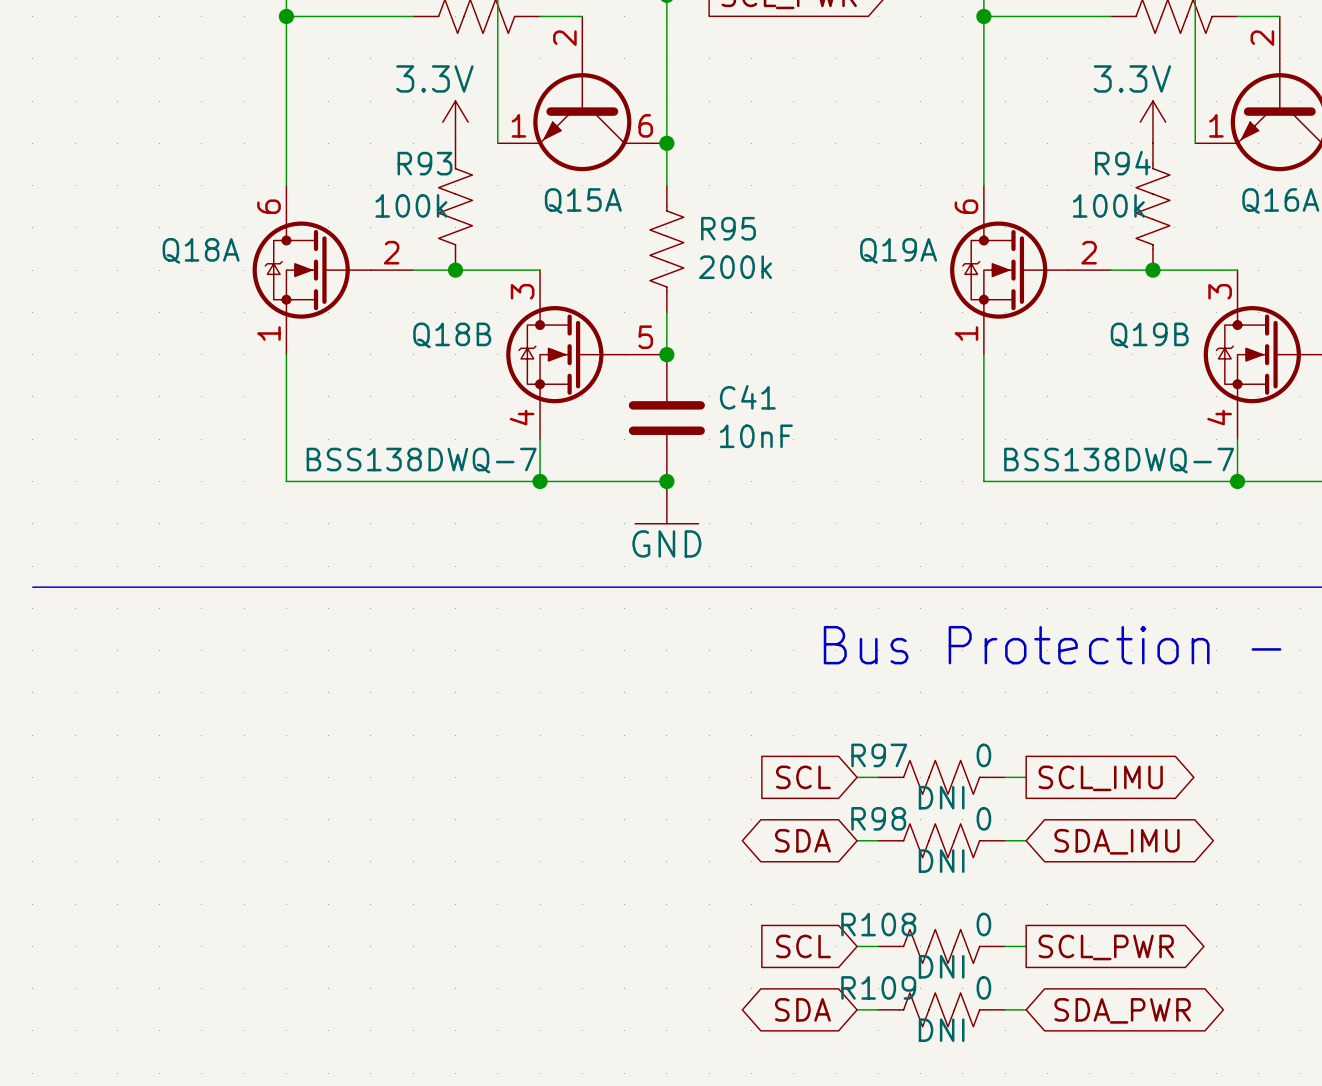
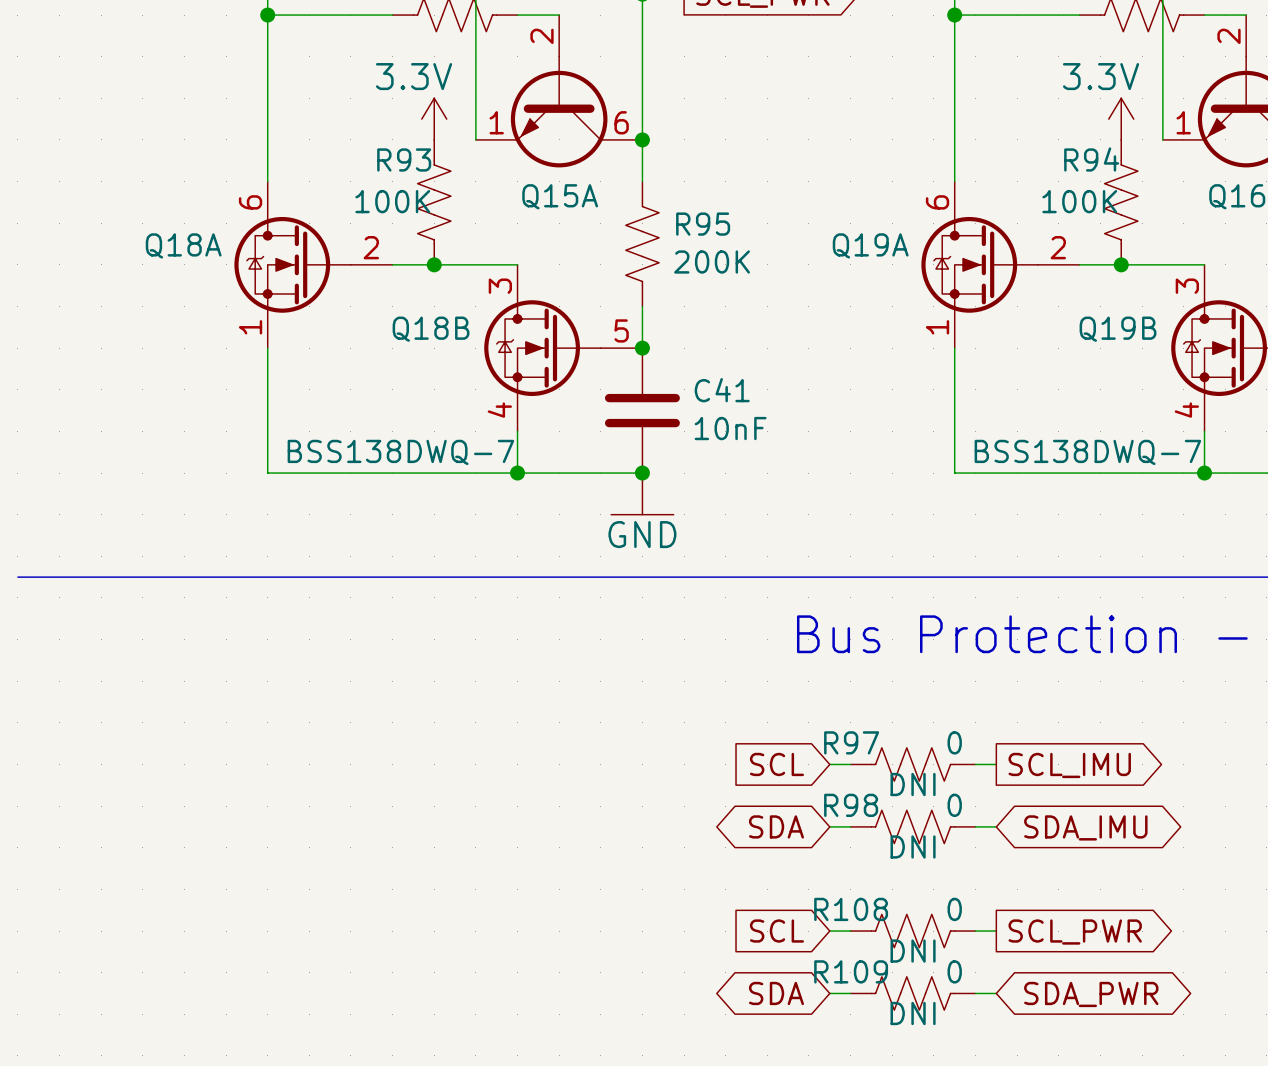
R93 value: 100k (411, 205) -> 100K (392, 201)
R94 value: 100k (1108, 205) -> 100K (1079, 201)
R95 value: 200k (735, 267) -> 200K (712, 261)

